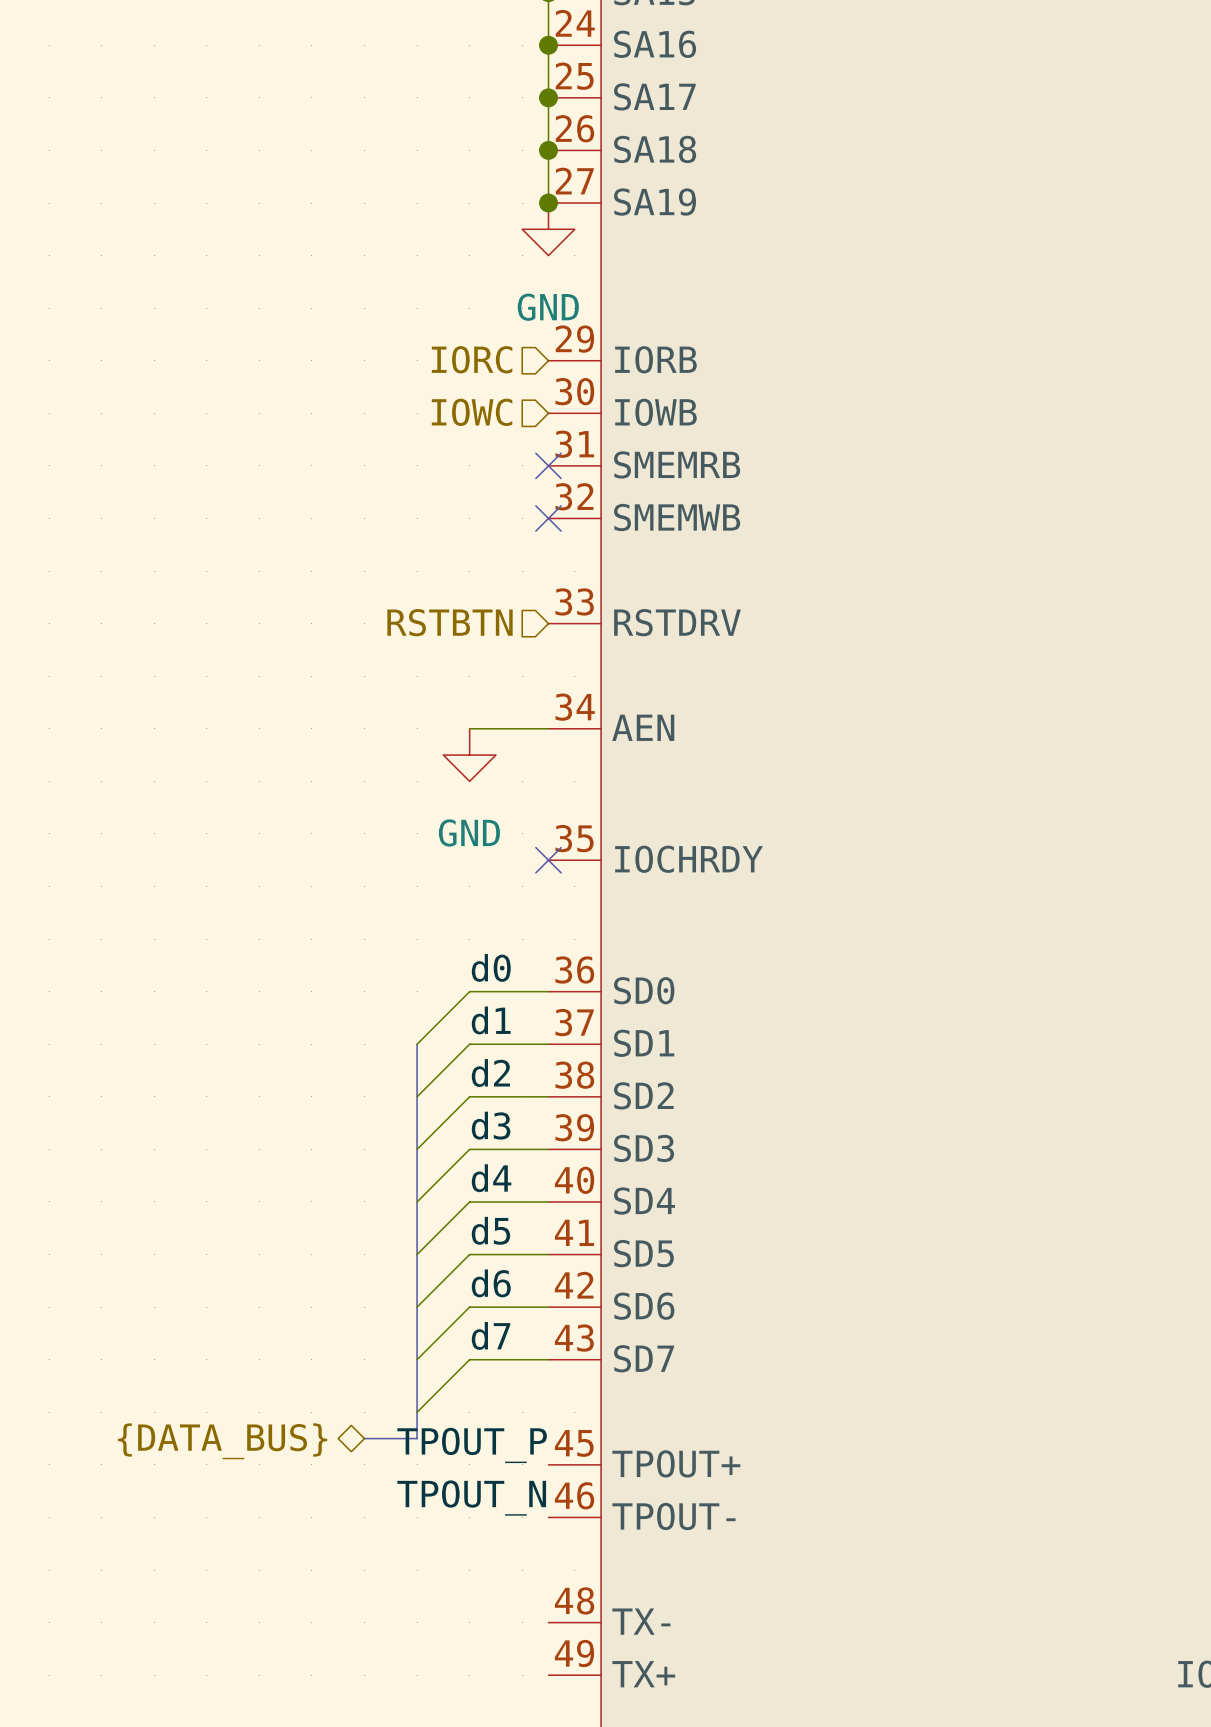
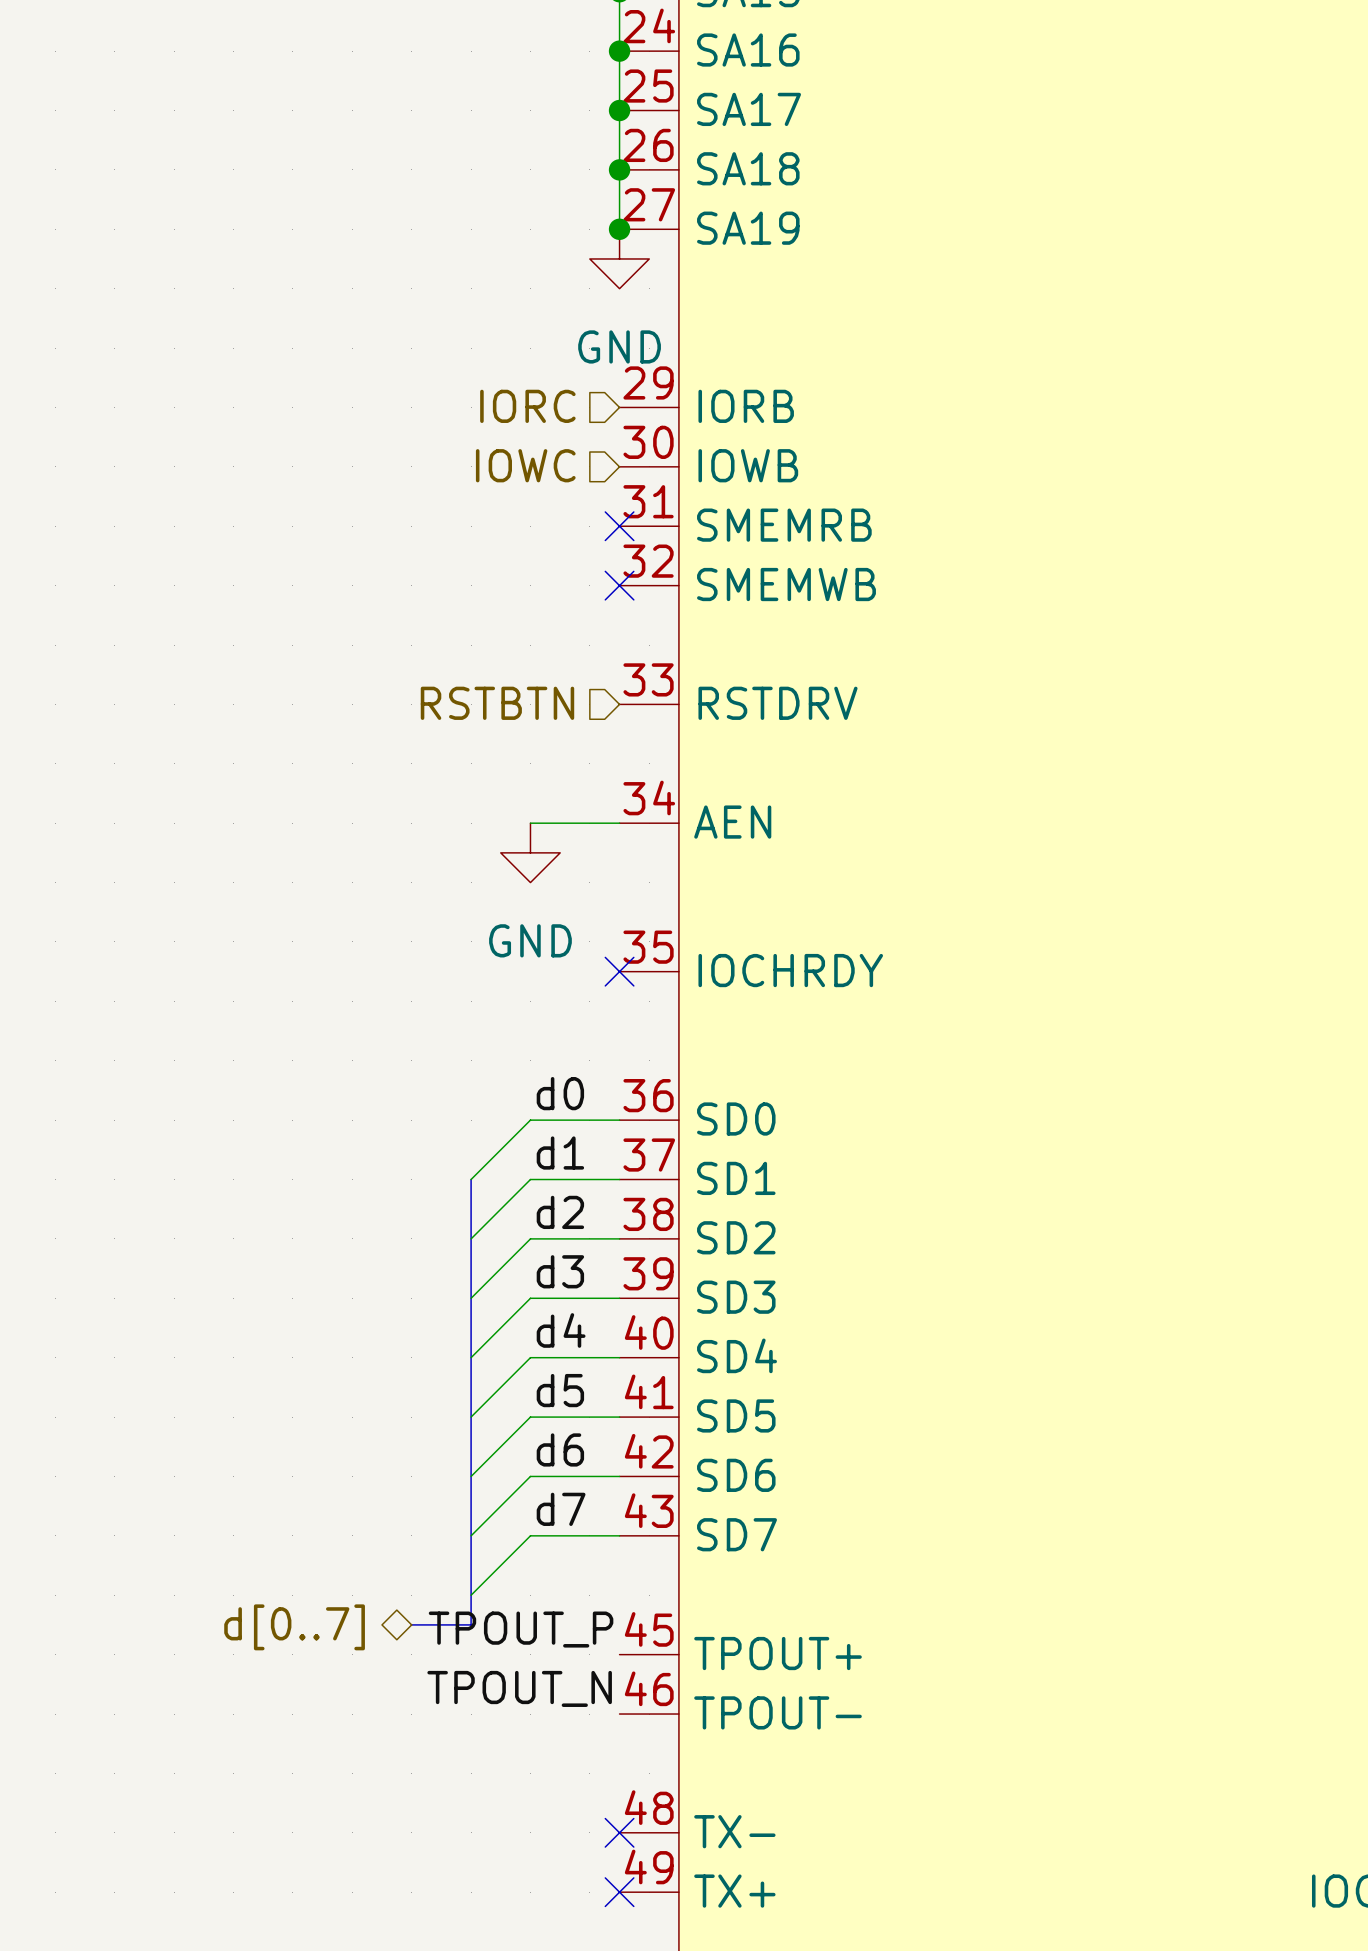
hierarchical label: {DATA_BUS} (222, 1441) -> d[0..7] (294, 1627)
no-connect mark: none -> (619, 1832)
no-connect mark: none -> (619, 1892)

